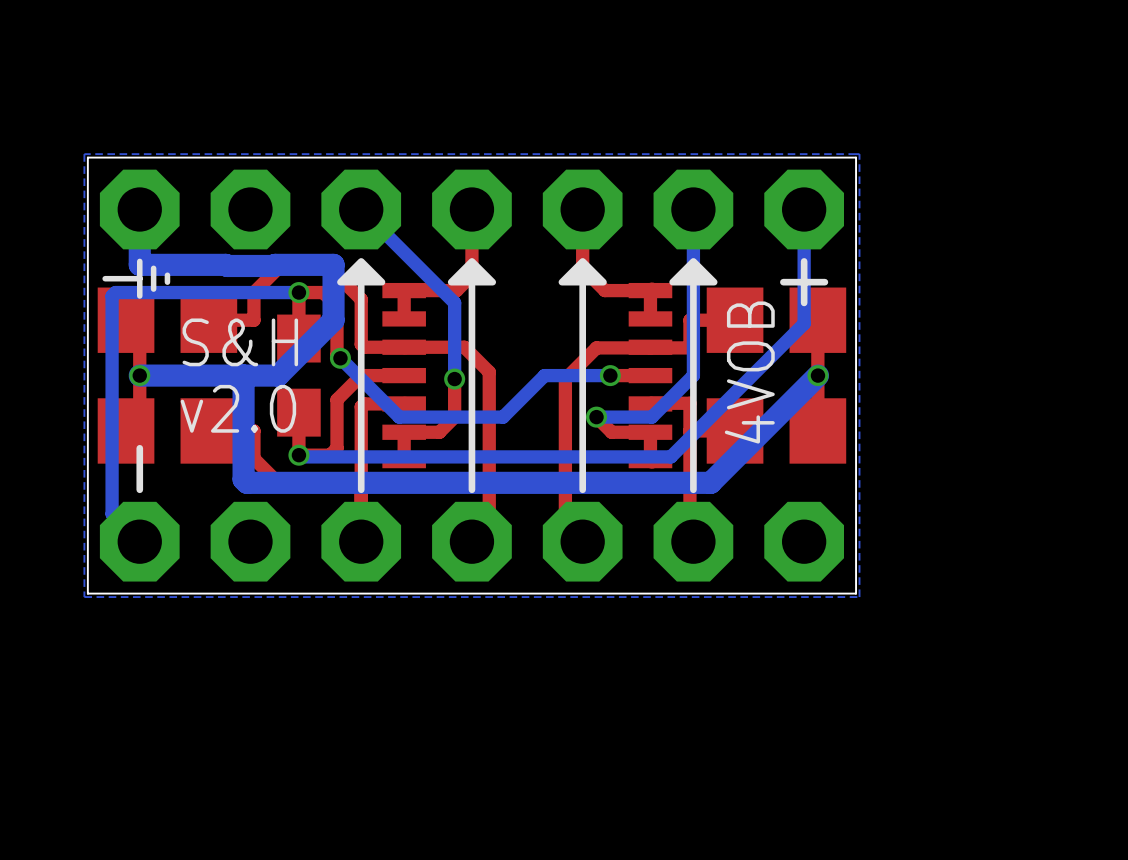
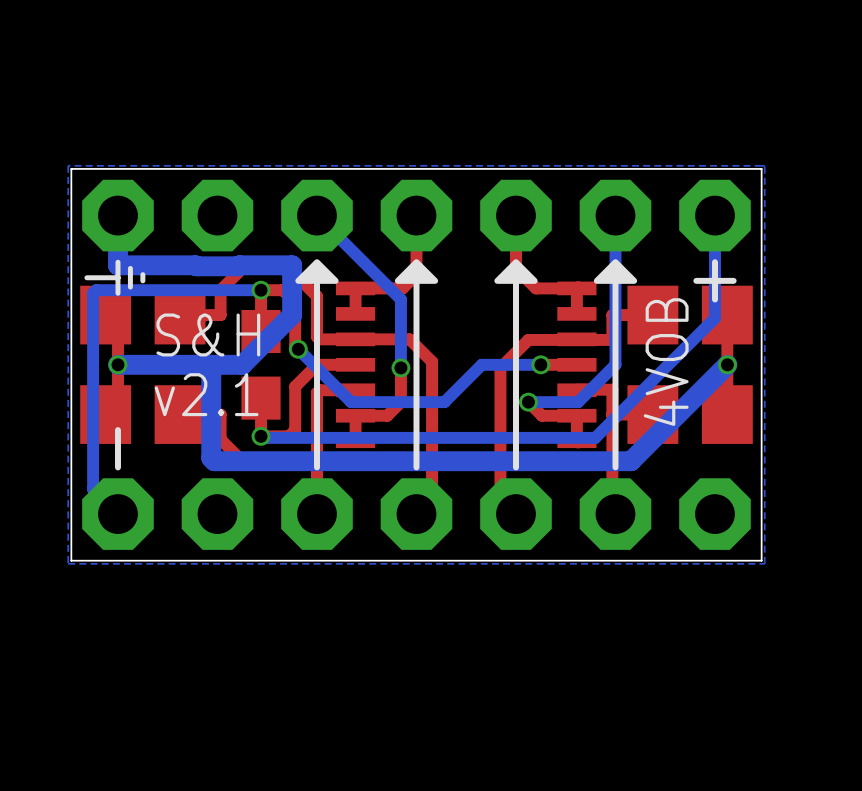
text: v2.0 (238, 408) -> v2.1 (206, 394)

